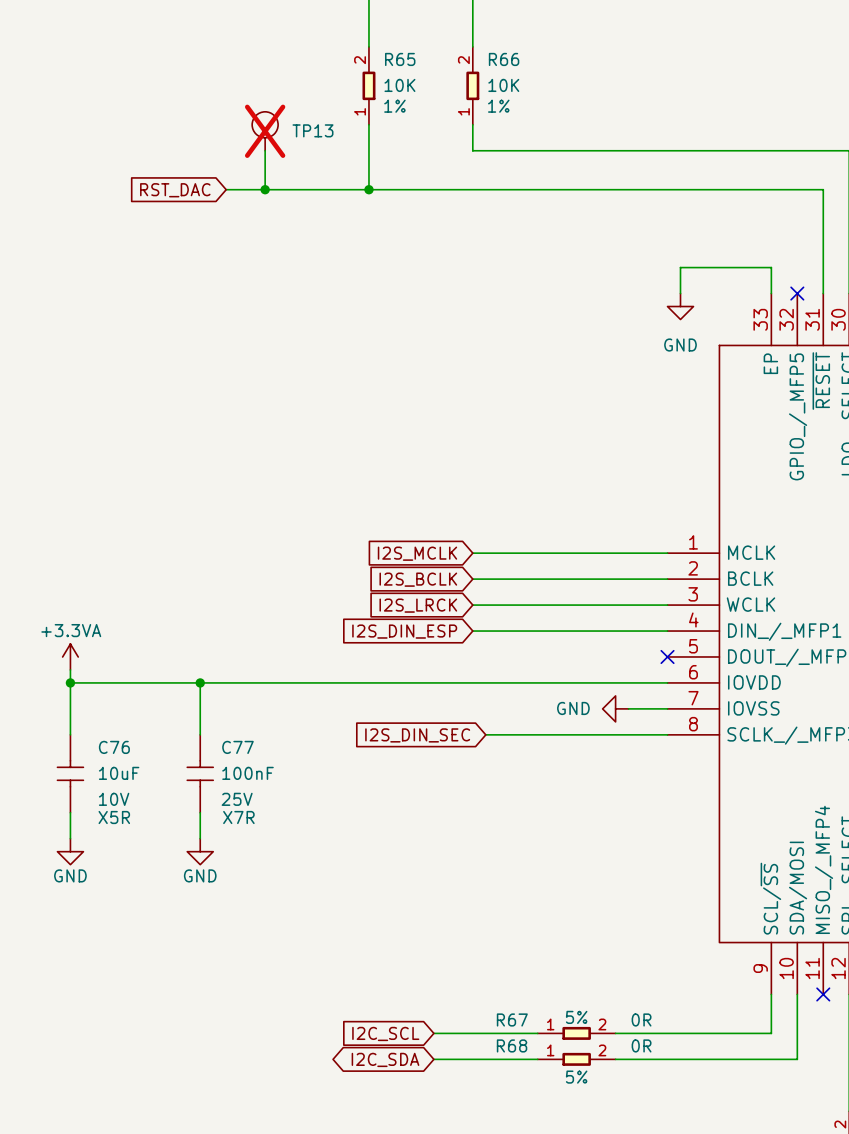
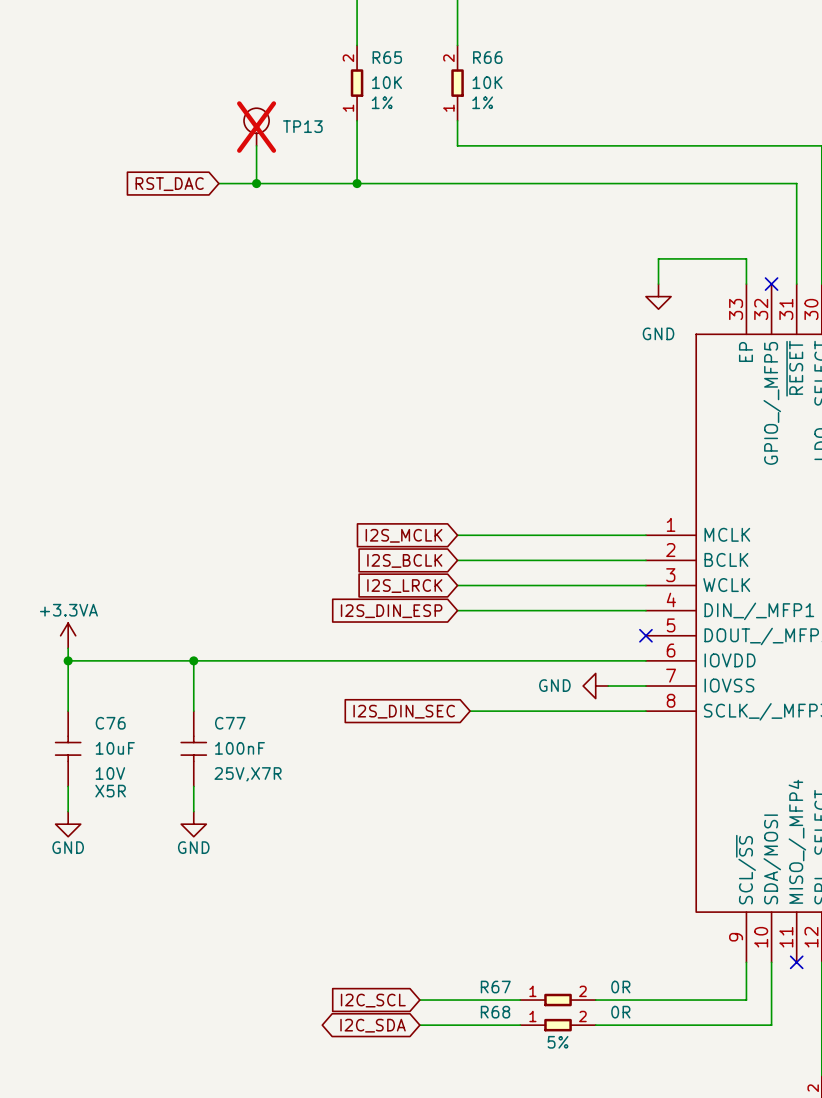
C77 text: 25V (237, 799) -> 25V,X7R (248, 774)
C77 text: X7R (238, 817) -> none
R67 text: 5% (576, 1017) -> none

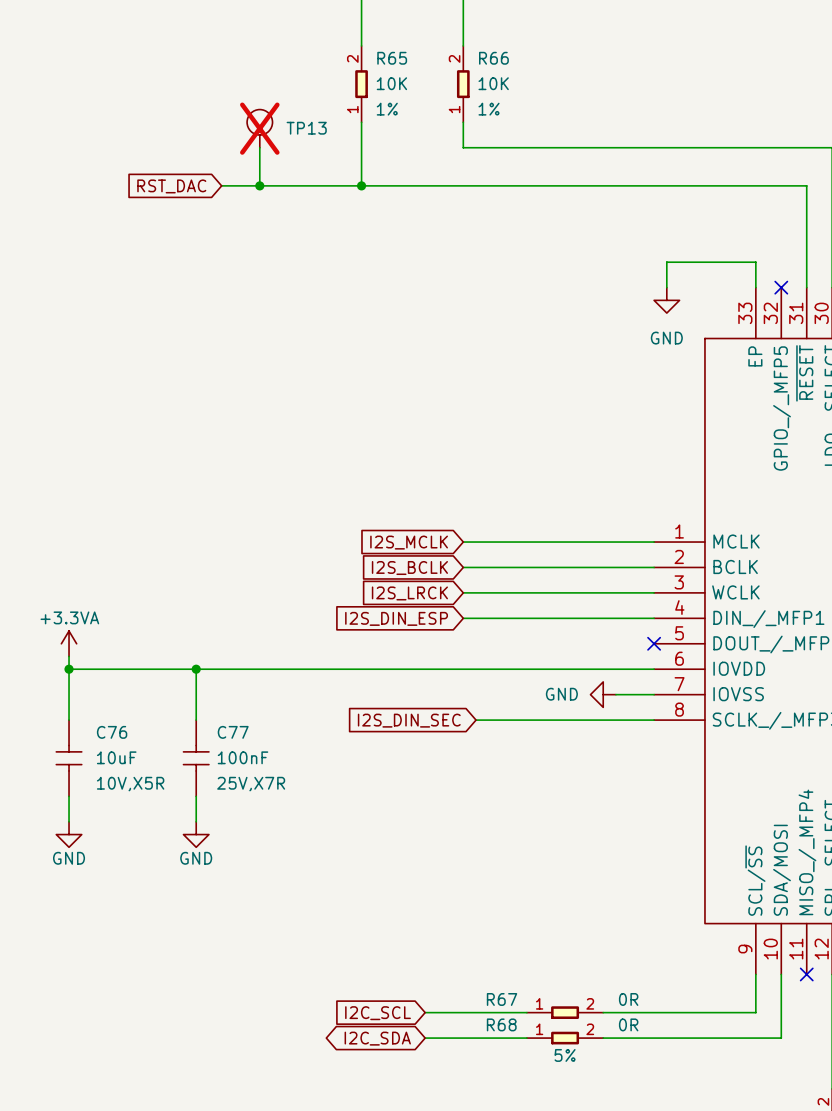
R65 text: 1% (382, 102) -> none
R66 text: 1% (482, 102) -> none
R65 text: none -> 1% (387, 109)
R66 text: none -> 1% (489, 109)
C76 text: 10V (110, 773) -> 10V,X5R (130, 784)
C76 text: X5R (110, 791) -> none

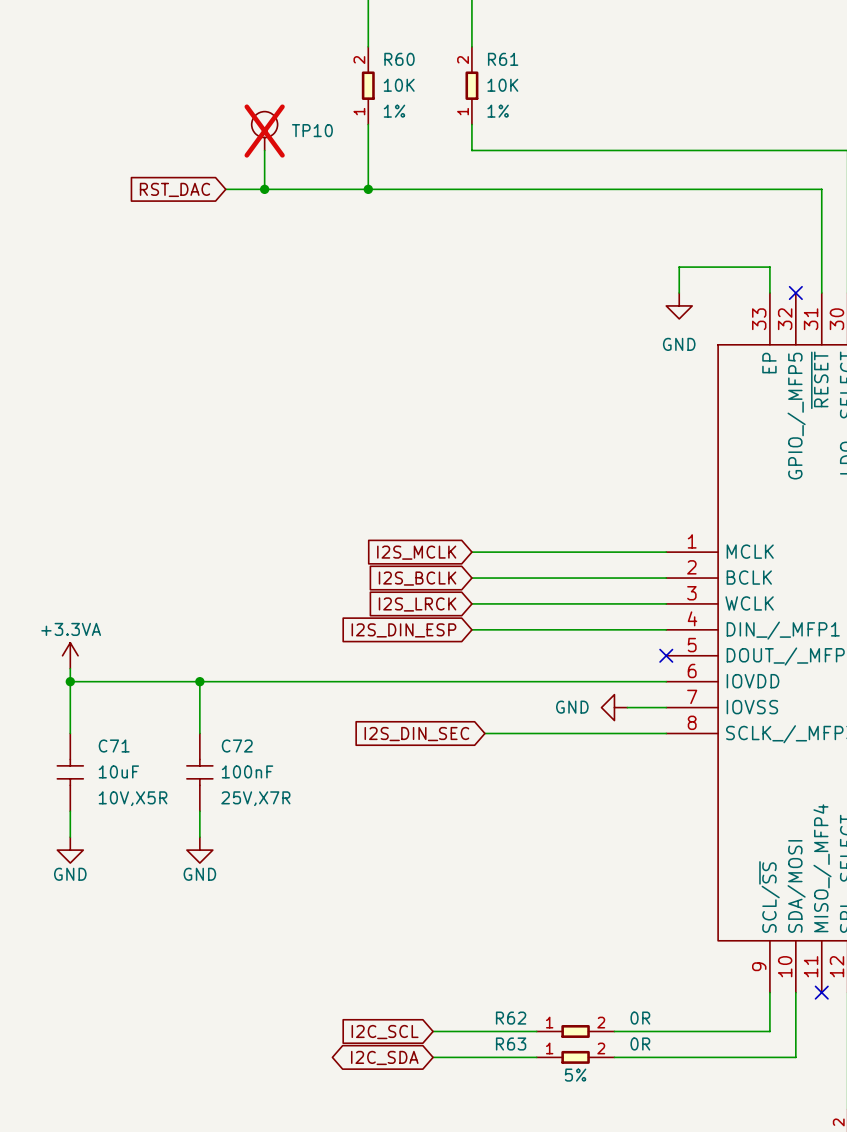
R65 name: R65 (392, 58) -> R60 (399, 59)
R66 name: R66 (493, 58) -> R61 (503, 59)
TP13 name: TP13 (306, 128) -> TP10 (312, 130)
C76 name: C76 (112, 732) -> C71 (114, 746)
C77 name: C77 (233, 732) -> C72 (237, 746)
R67 name: R67 (502, 999) -> R62 (511, 1018)
R68 name: R68 (501, 1024) -> R63 (511, 1044)

